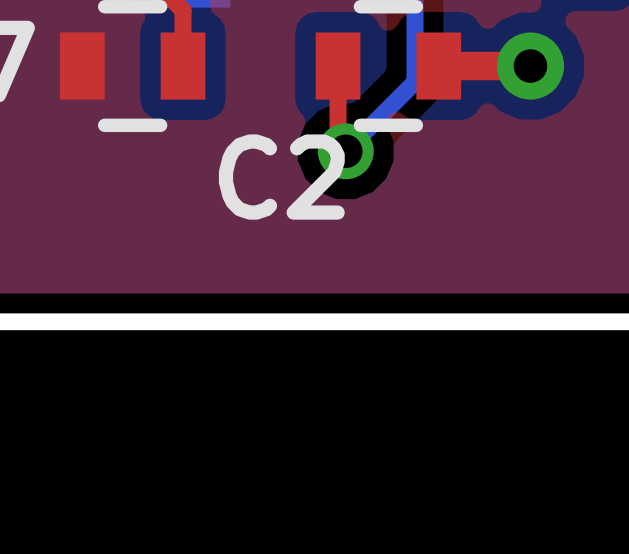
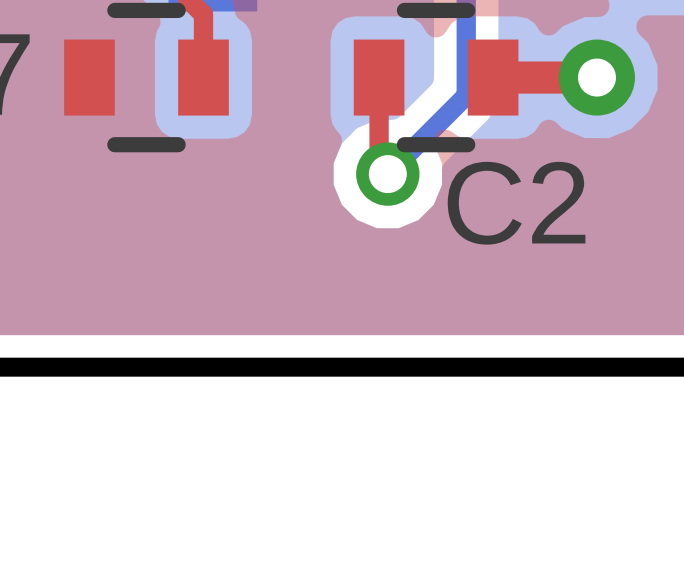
C2 name position: C2 (281, 177) -> C2 (516, 203)

